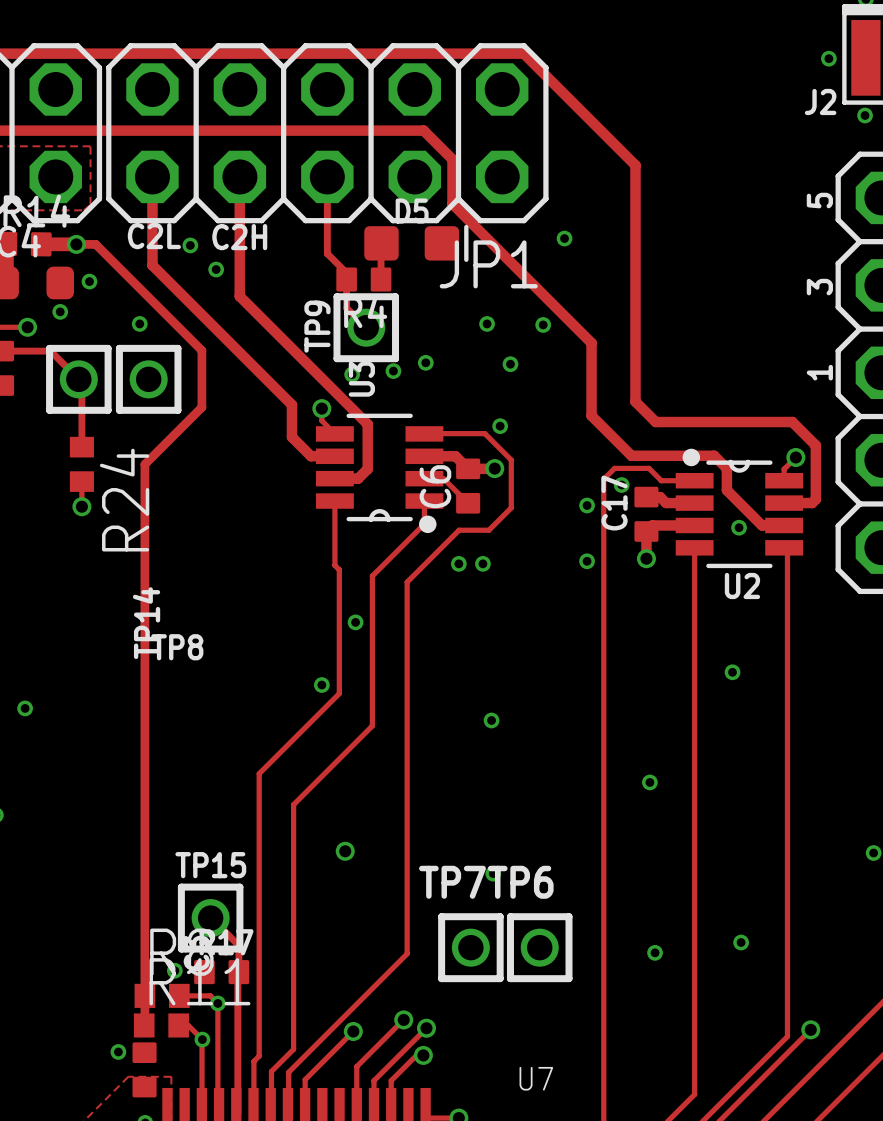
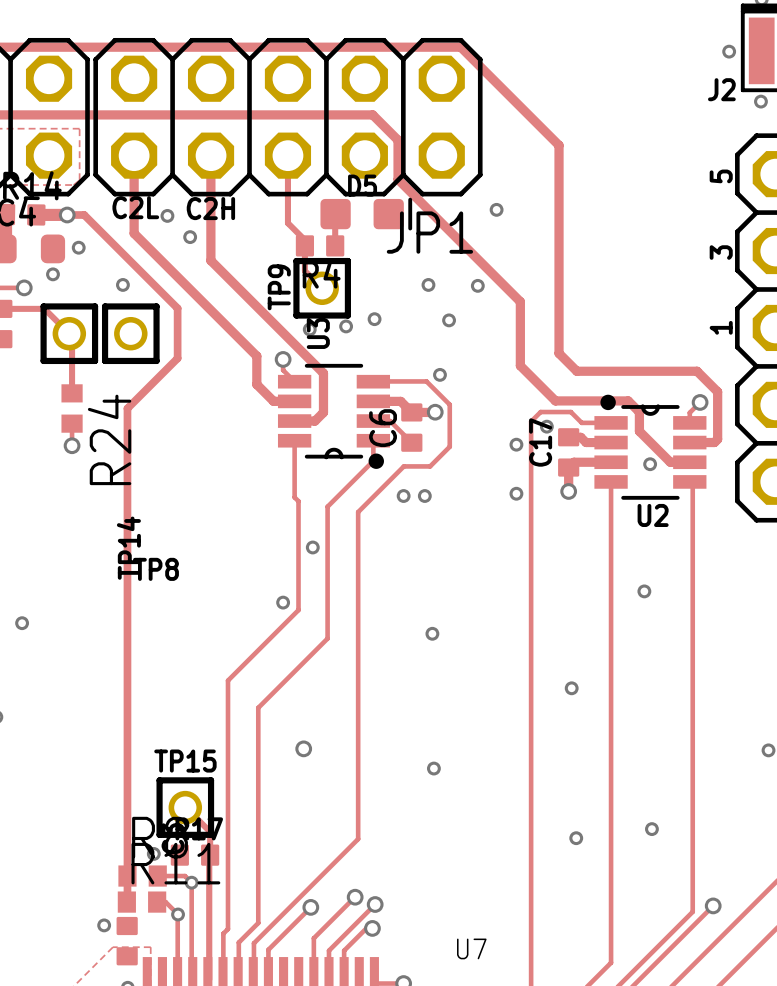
TP7: (470, 947) -> none
TP6: (539, 947) -> none

